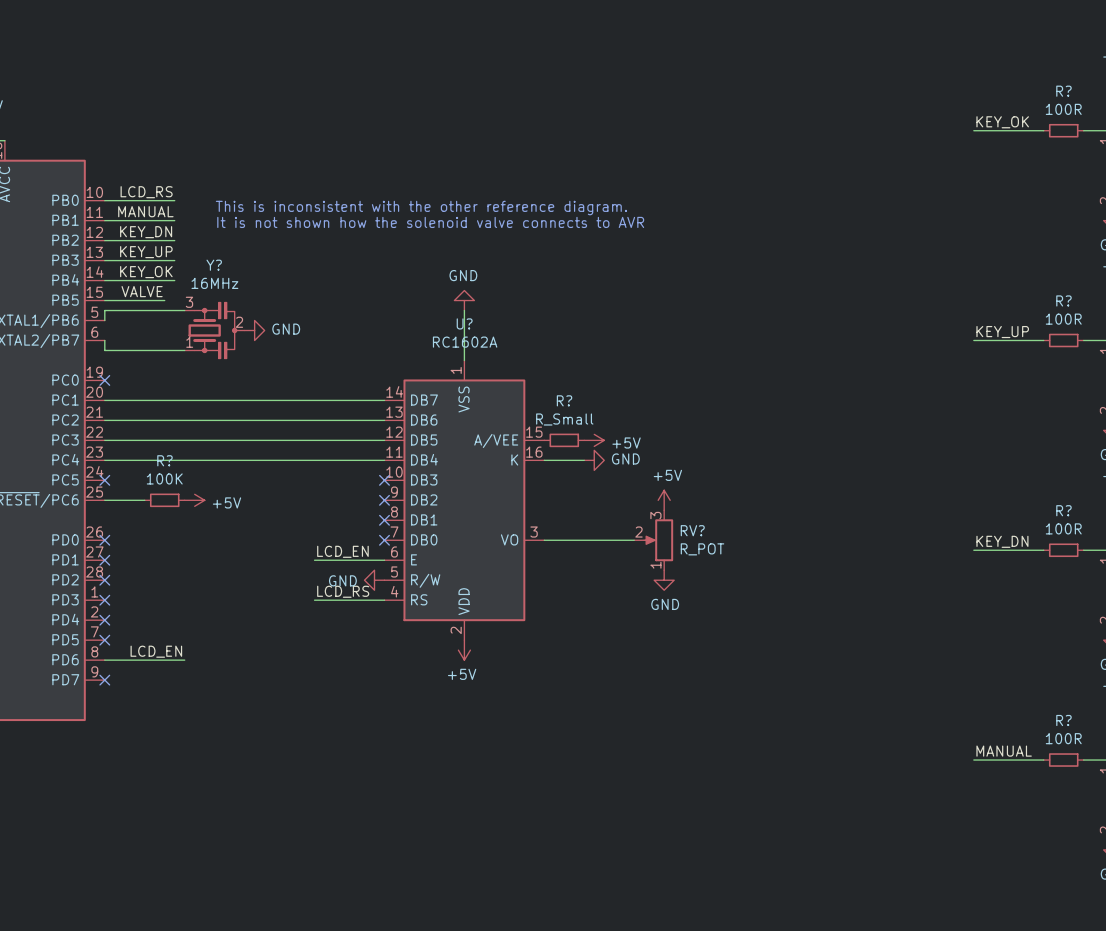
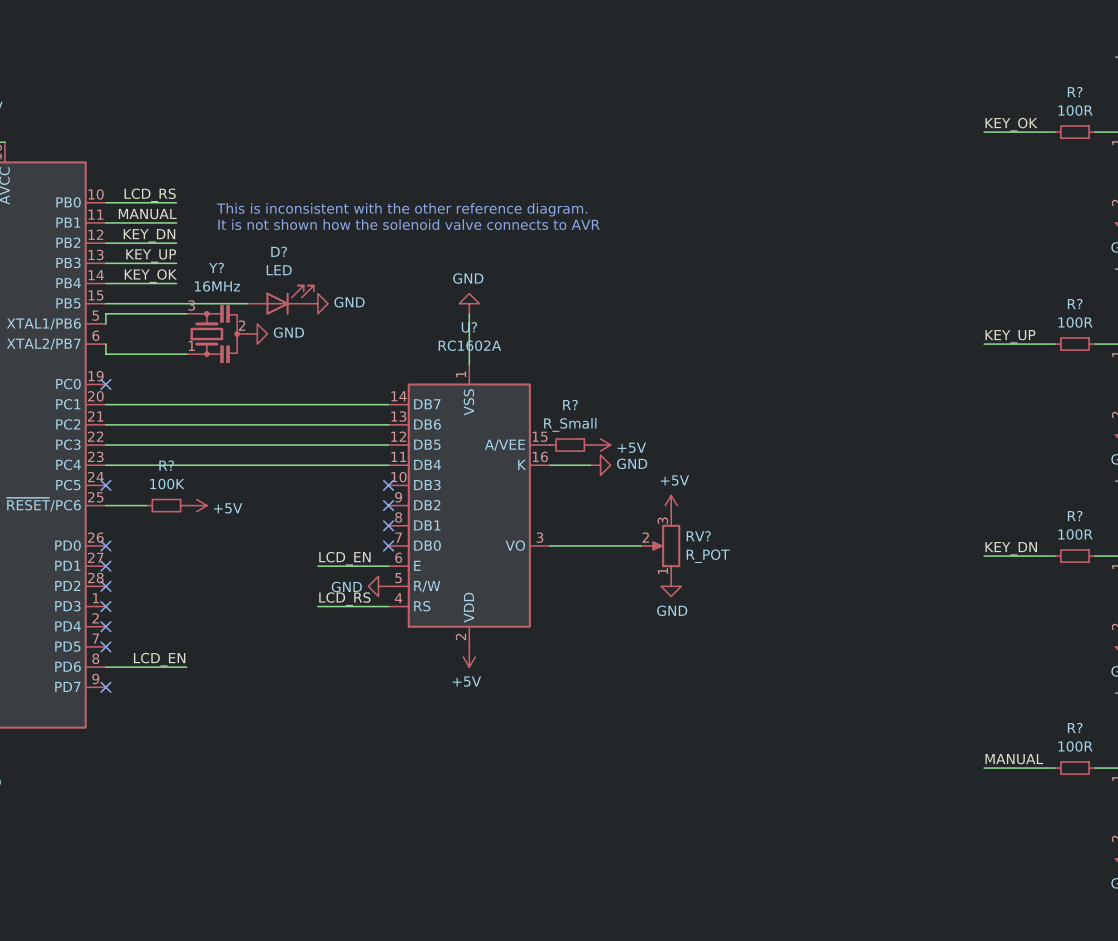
label: VALVE (142, 291) -> none
D?: none -> LED (280, 300)
wire: none -> (166, 303) (247, 303)
power symbol: none -> GND (317, 303)

